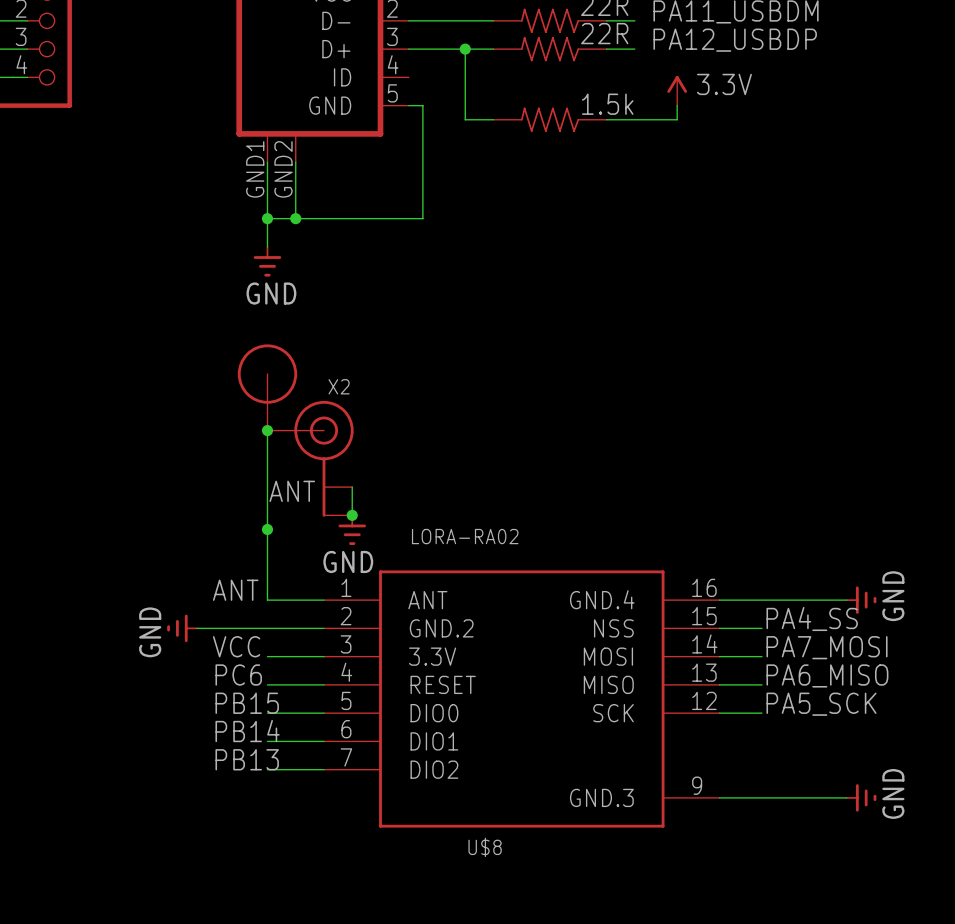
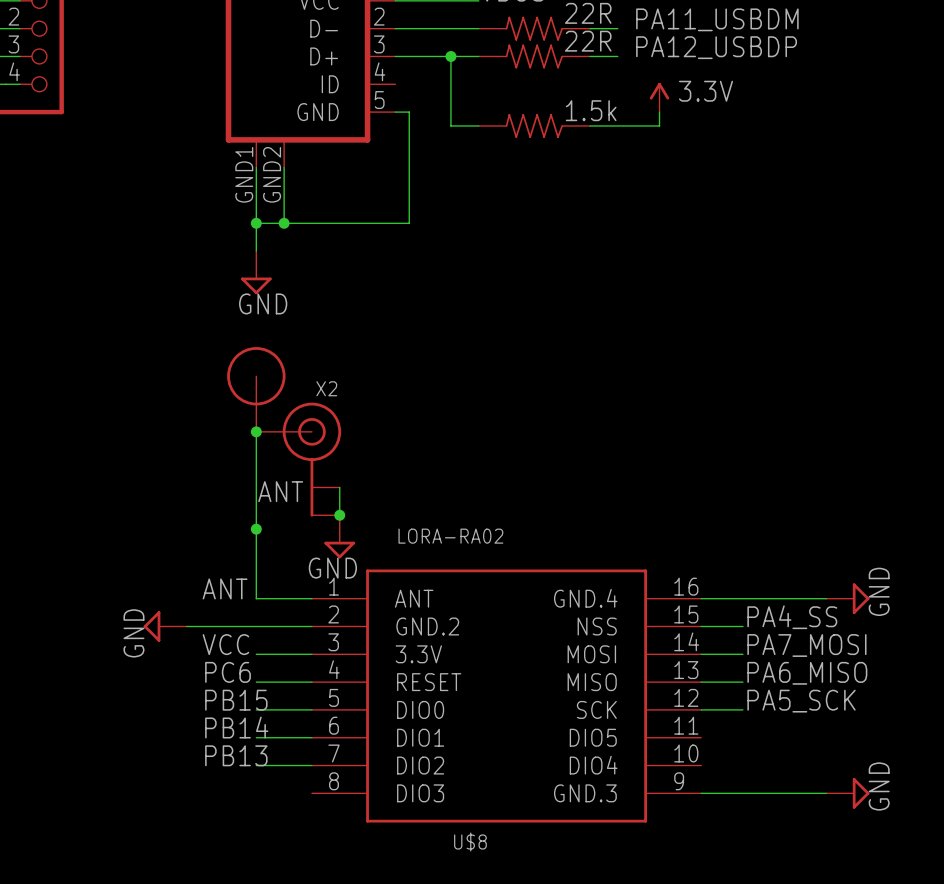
power symbol shape: [253, 246, 282, 277] -> [241, 251, 272, 295]
power symbol shape: [338, 514, 367, 546] -> [324, 515, 356, 559]
U$8 symbol: [323, 570, 720, 828] -> [311, 569, 702, 823]
power symbol shape: [845, 586, 877, 614] -> [826, 583, 870, 614]
power symbol shape: [167, 614, 198, 643] -> [143, 611, 187, 642]
power symbol shape: [845, 784, 877, 812] -> [826, 778, 870, 809]

